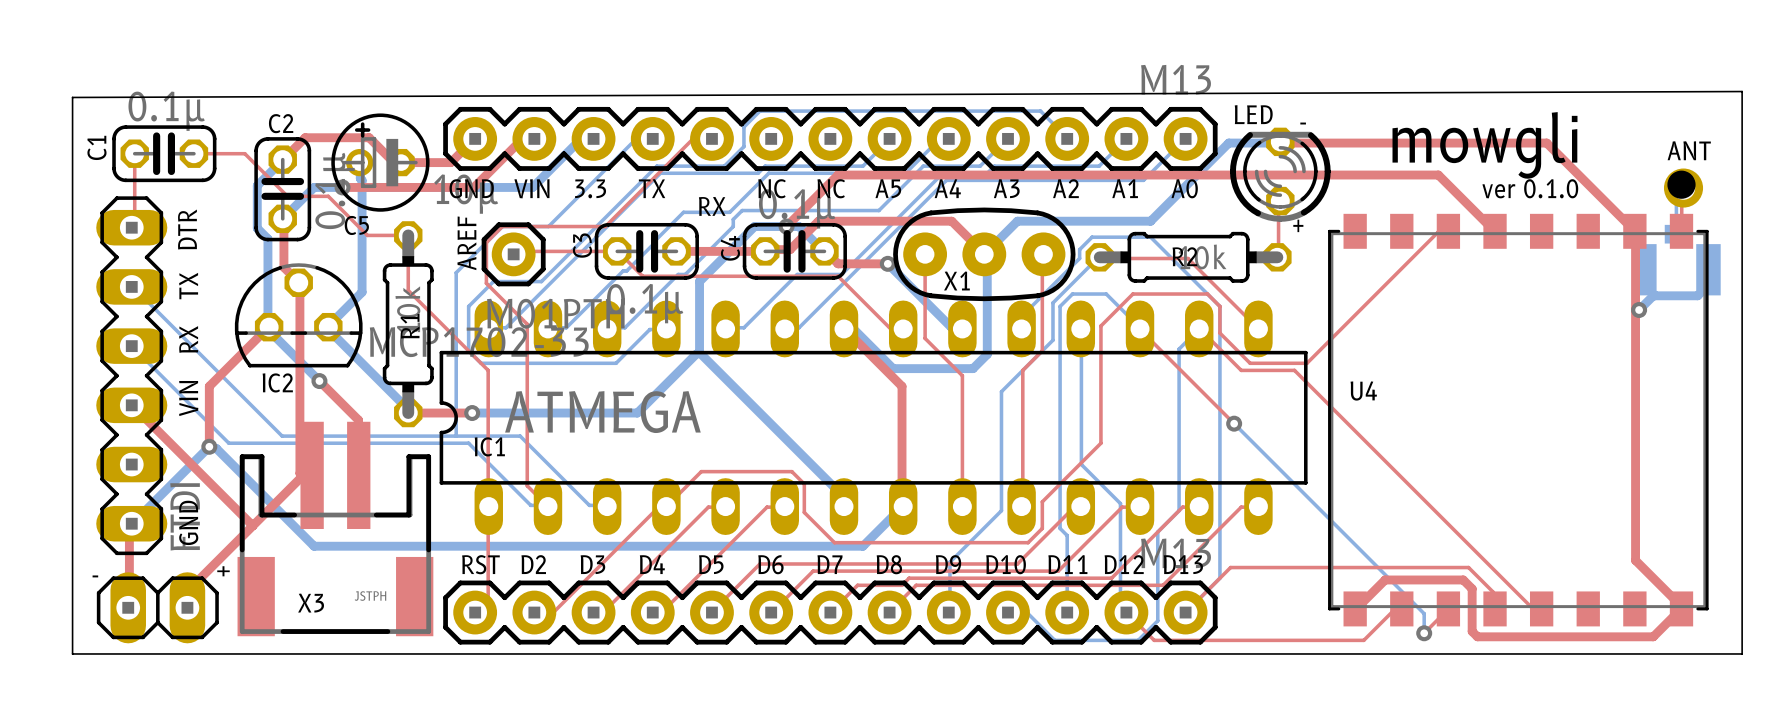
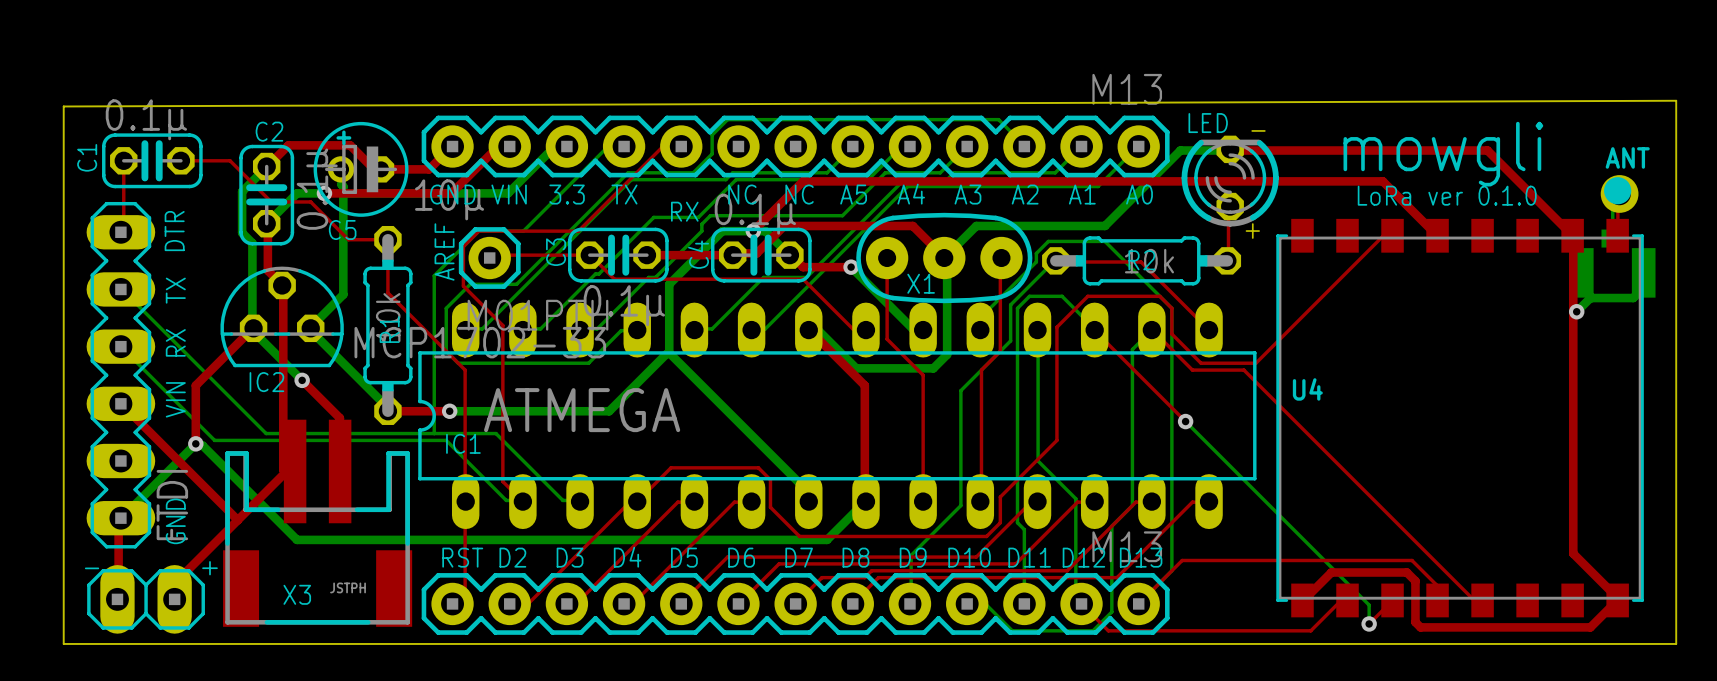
text: ver 0.1.0 (1530, 188) -> LoRa ver 0.1.0 (1447, 195)

